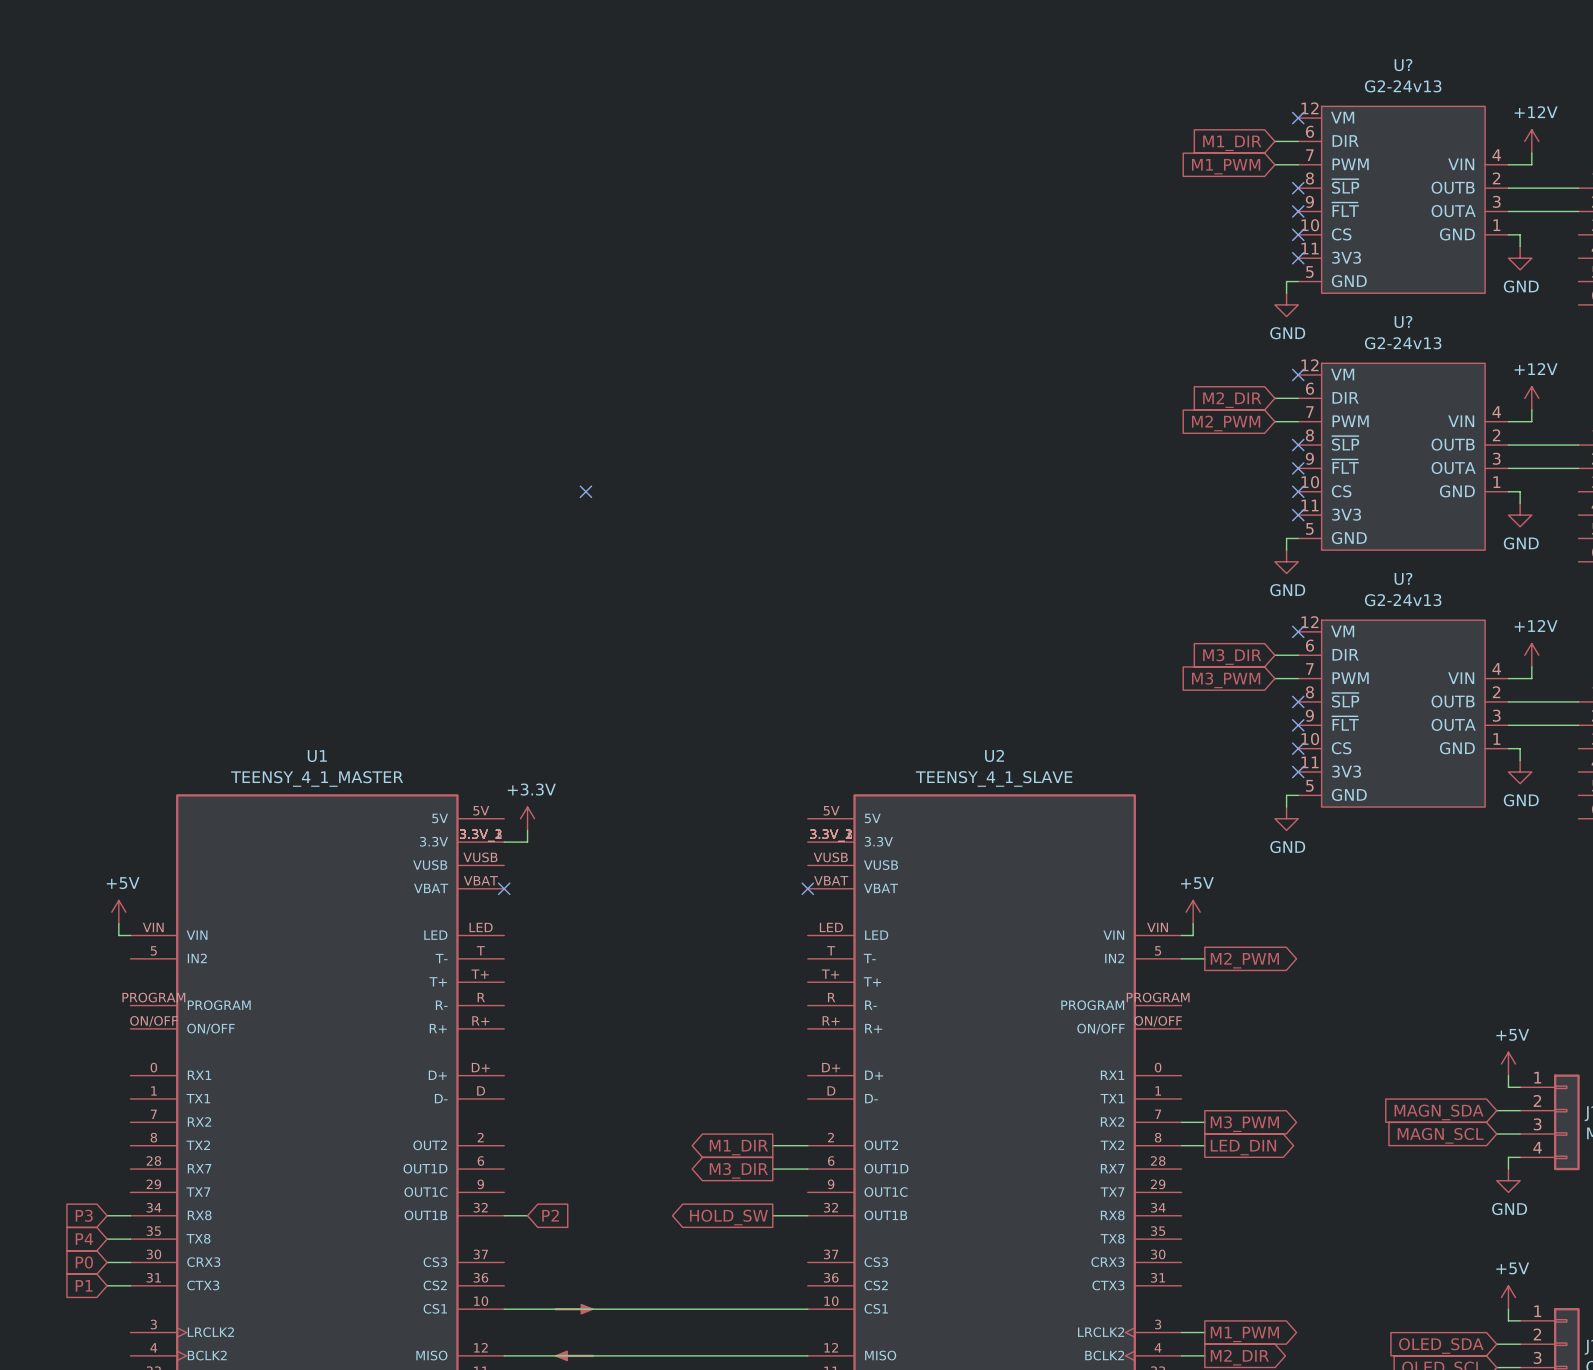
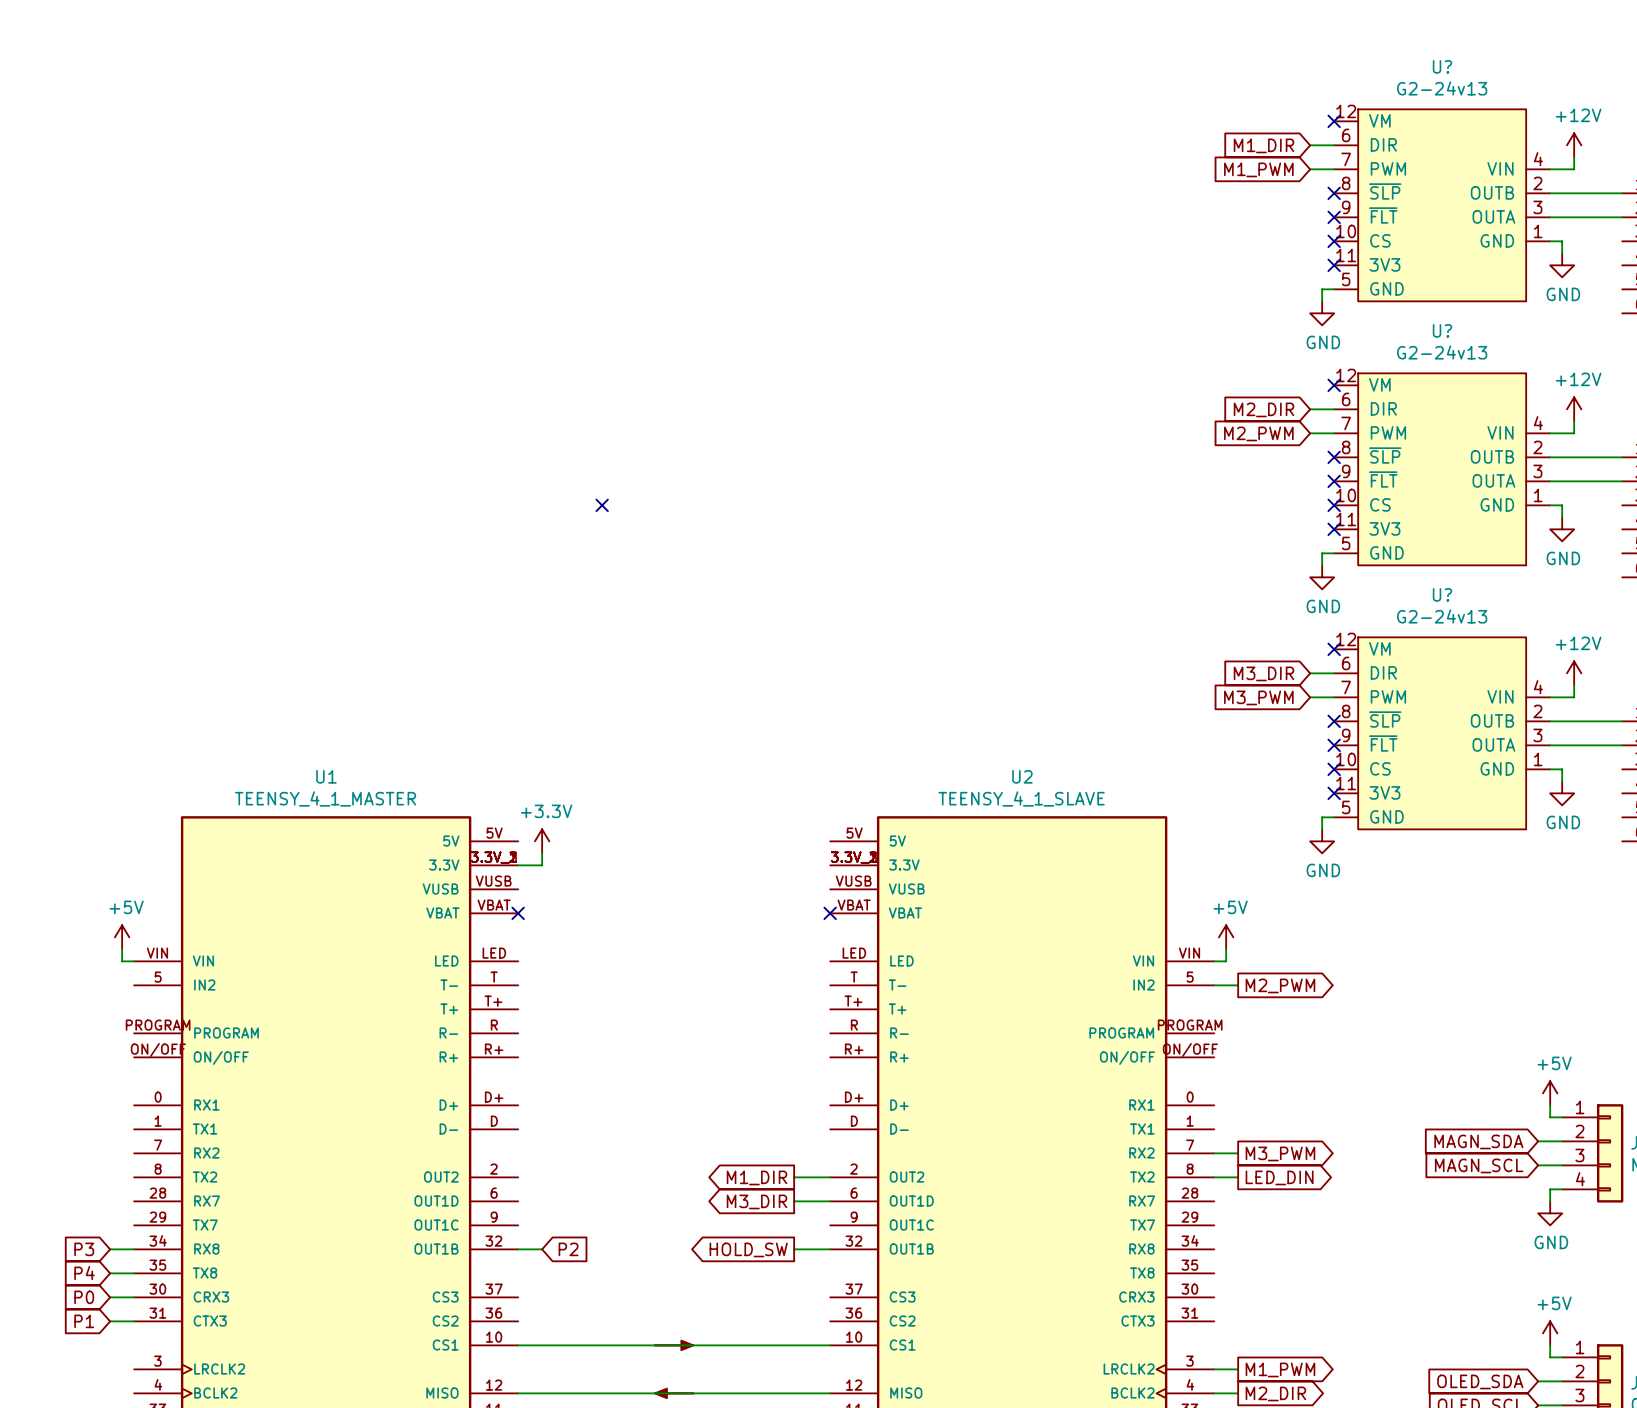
power symbol: (573, 1309) -> none
power symbol: none -> (673, 1345)
power symbol: (574, 1355) -> none
power symbol: none -> (674, 1393)

